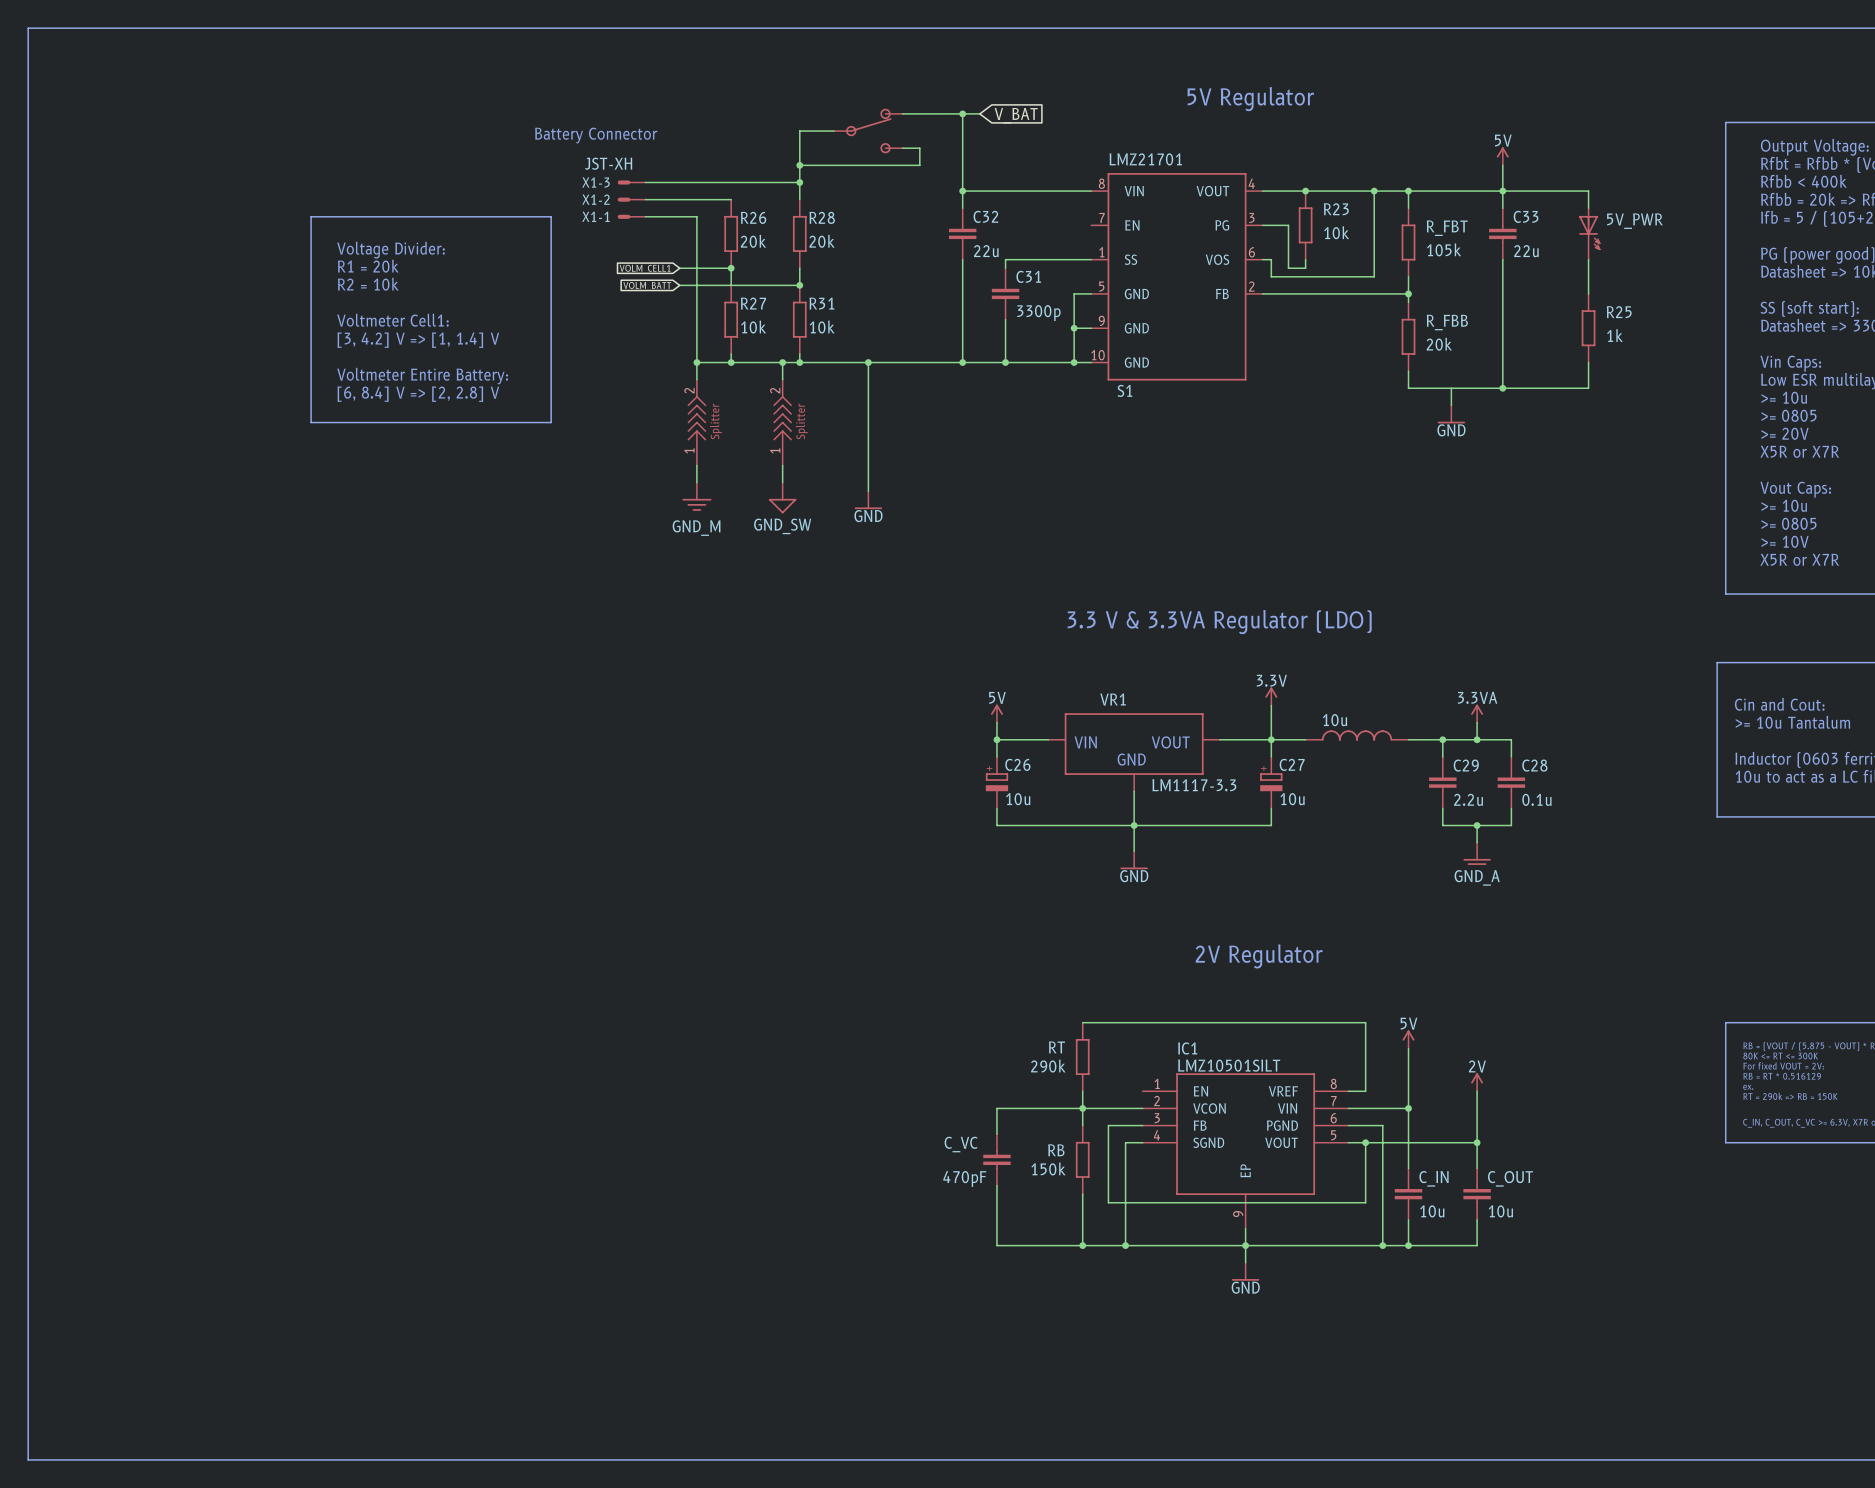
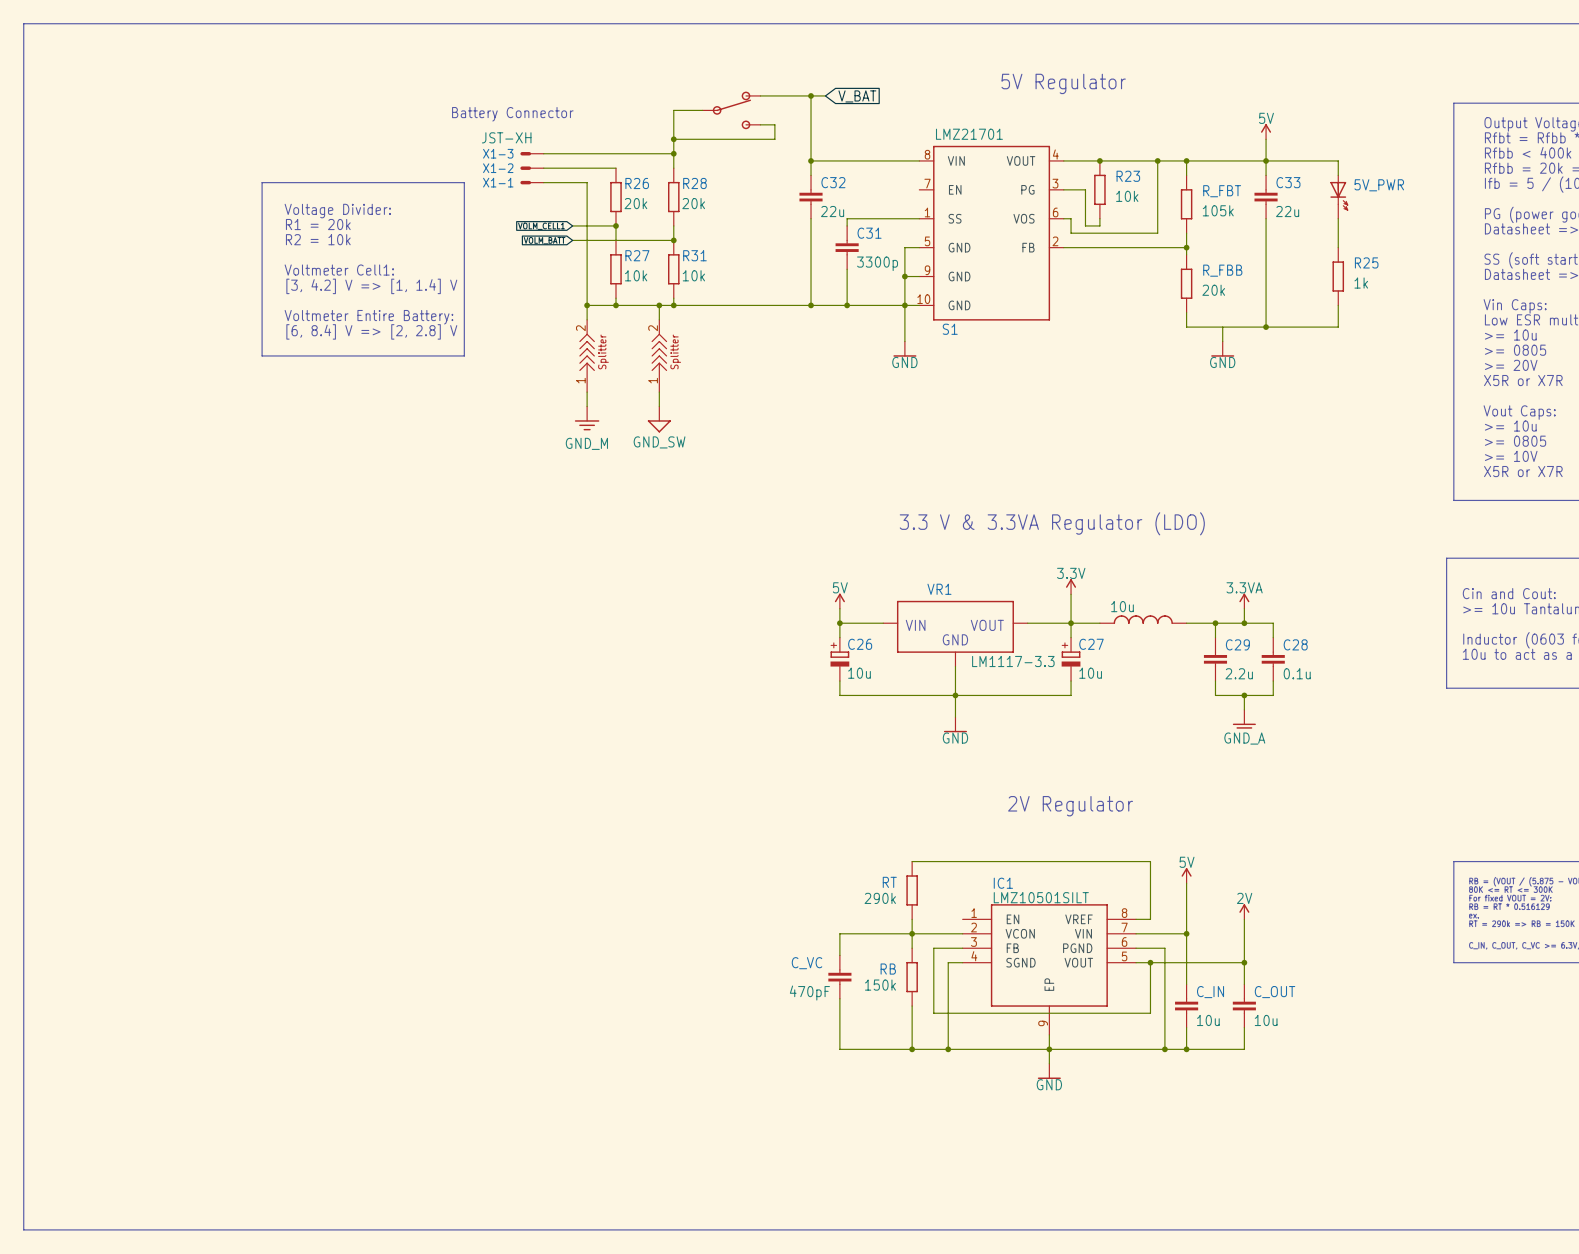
wire: (868, 362) (868, 491) -> none
junction: (868, 362) -> none
wire: none -> (904, 305) (904, 341)
power symbol: none -> GND (904, 349)
power symbol: GND (868, 500) -> none

